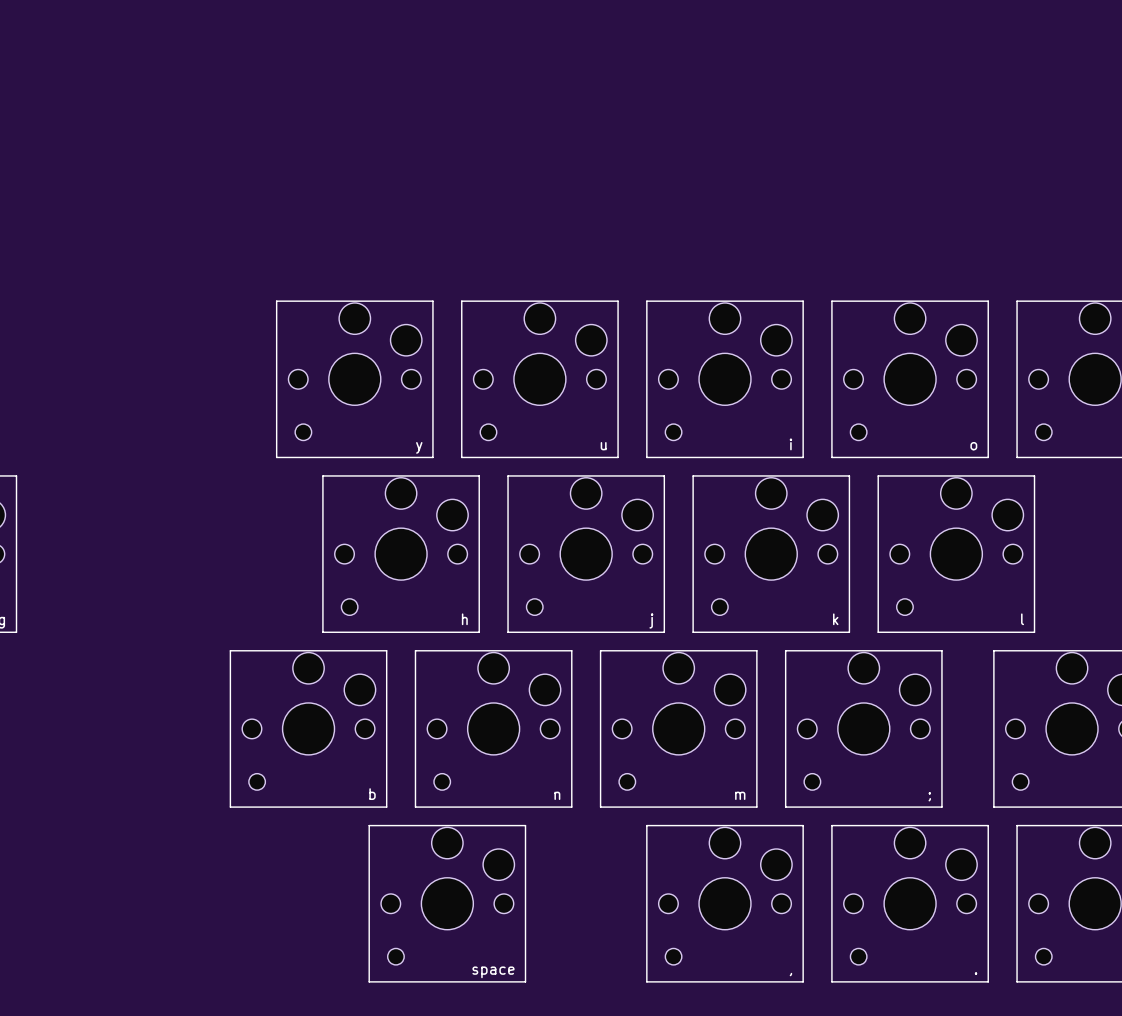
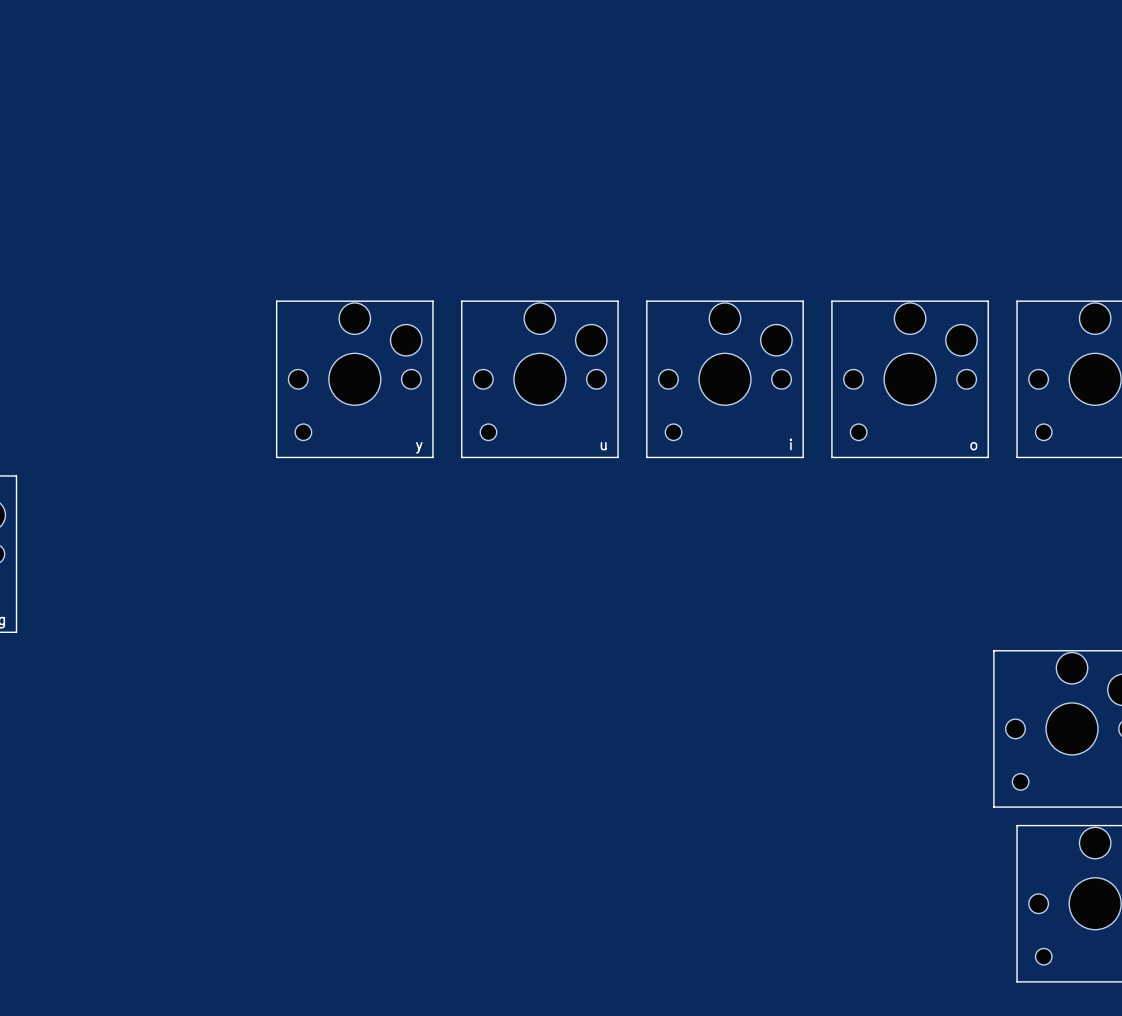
h: (401, 554) -> none
j: (586, 554) -> none
k: (771, 554) -> none
l: (956, 554) -> none
b: (308, 728) -> none
n: (493, 728) -> none
m: (678, 728) -> none
part: (863, 728) -> none
space: (447, 903) -> none
part: (724, 903) -> none
part: (910, 903) -> none

